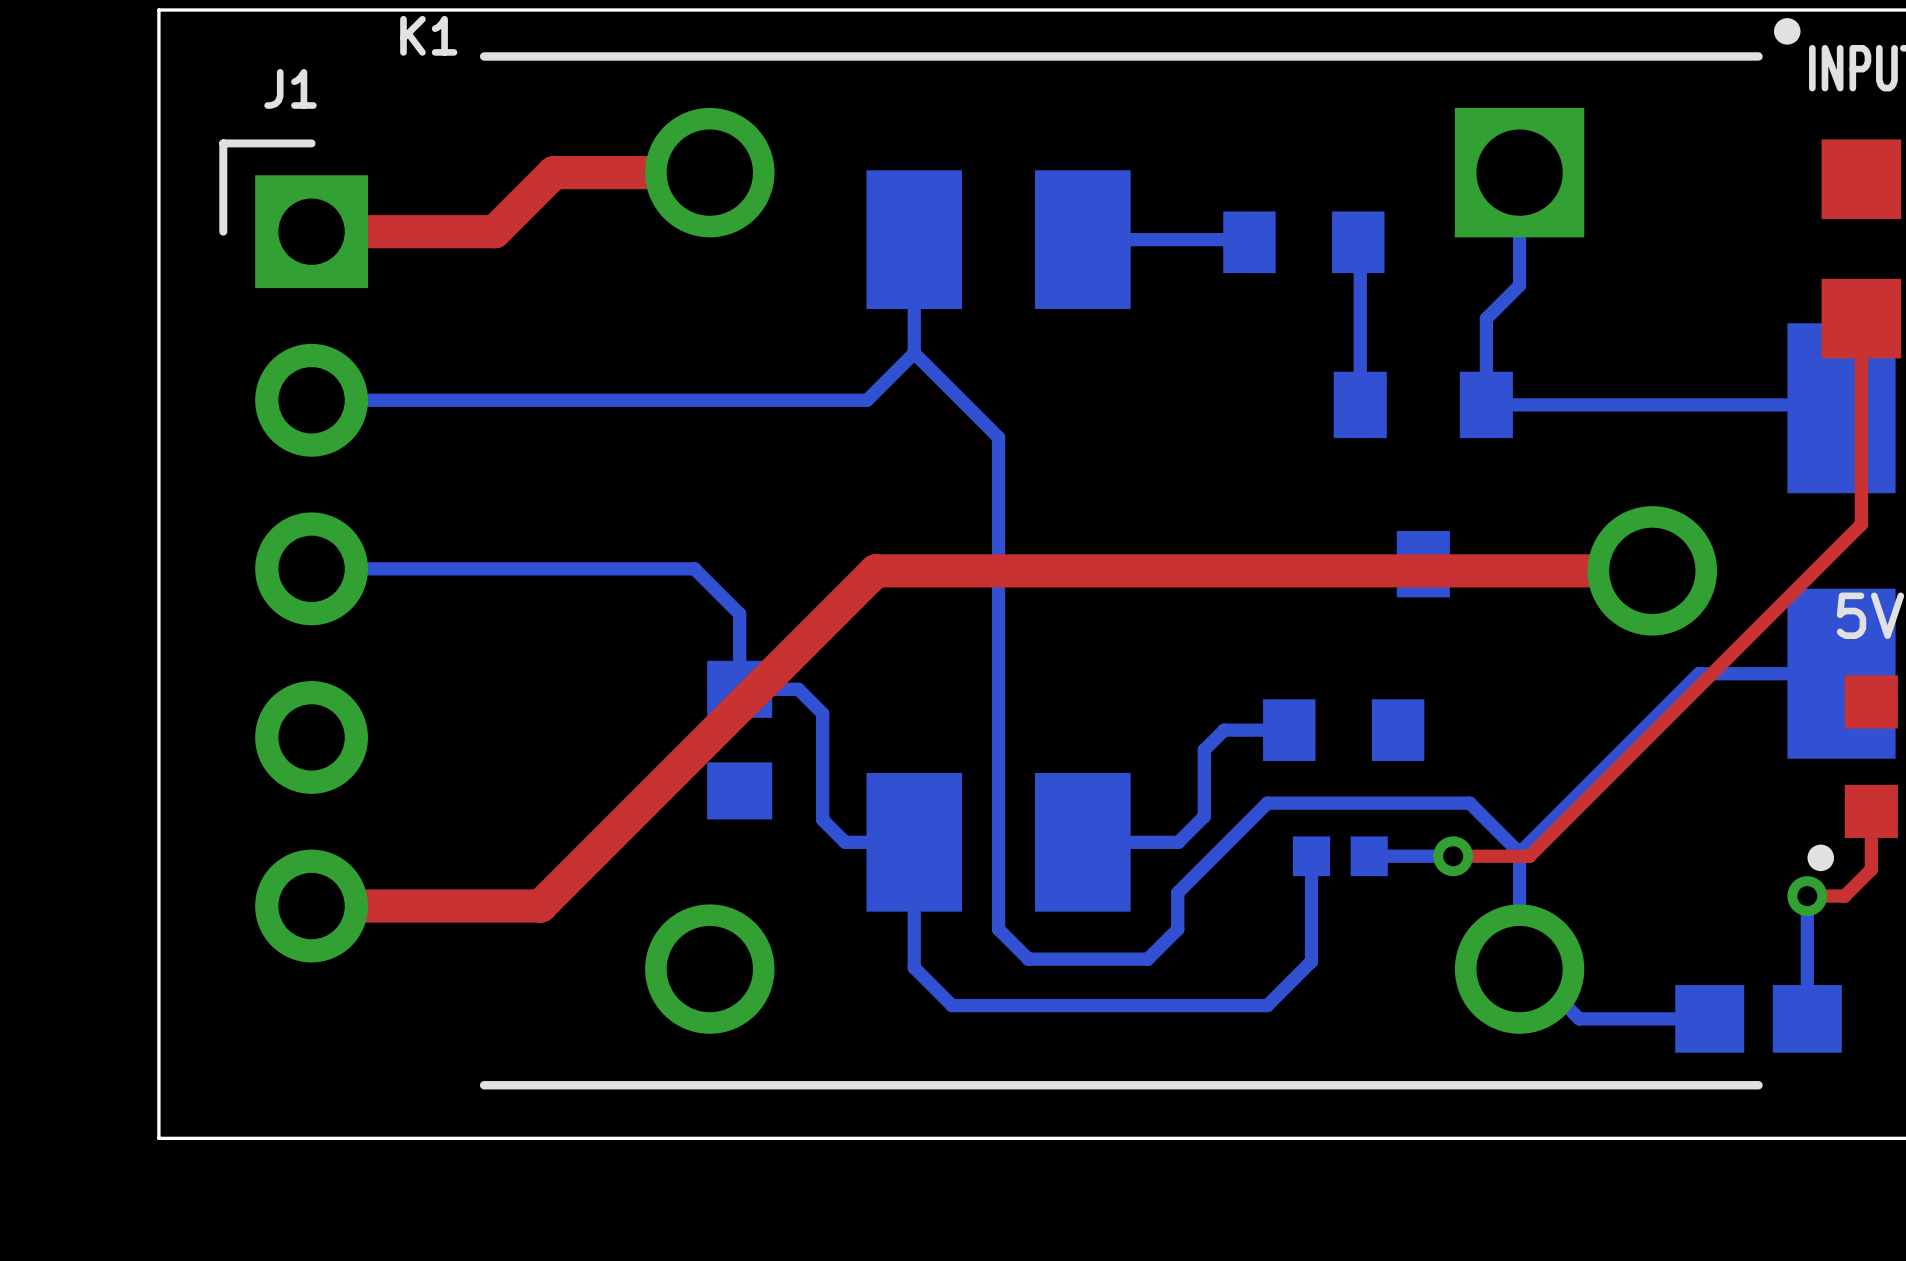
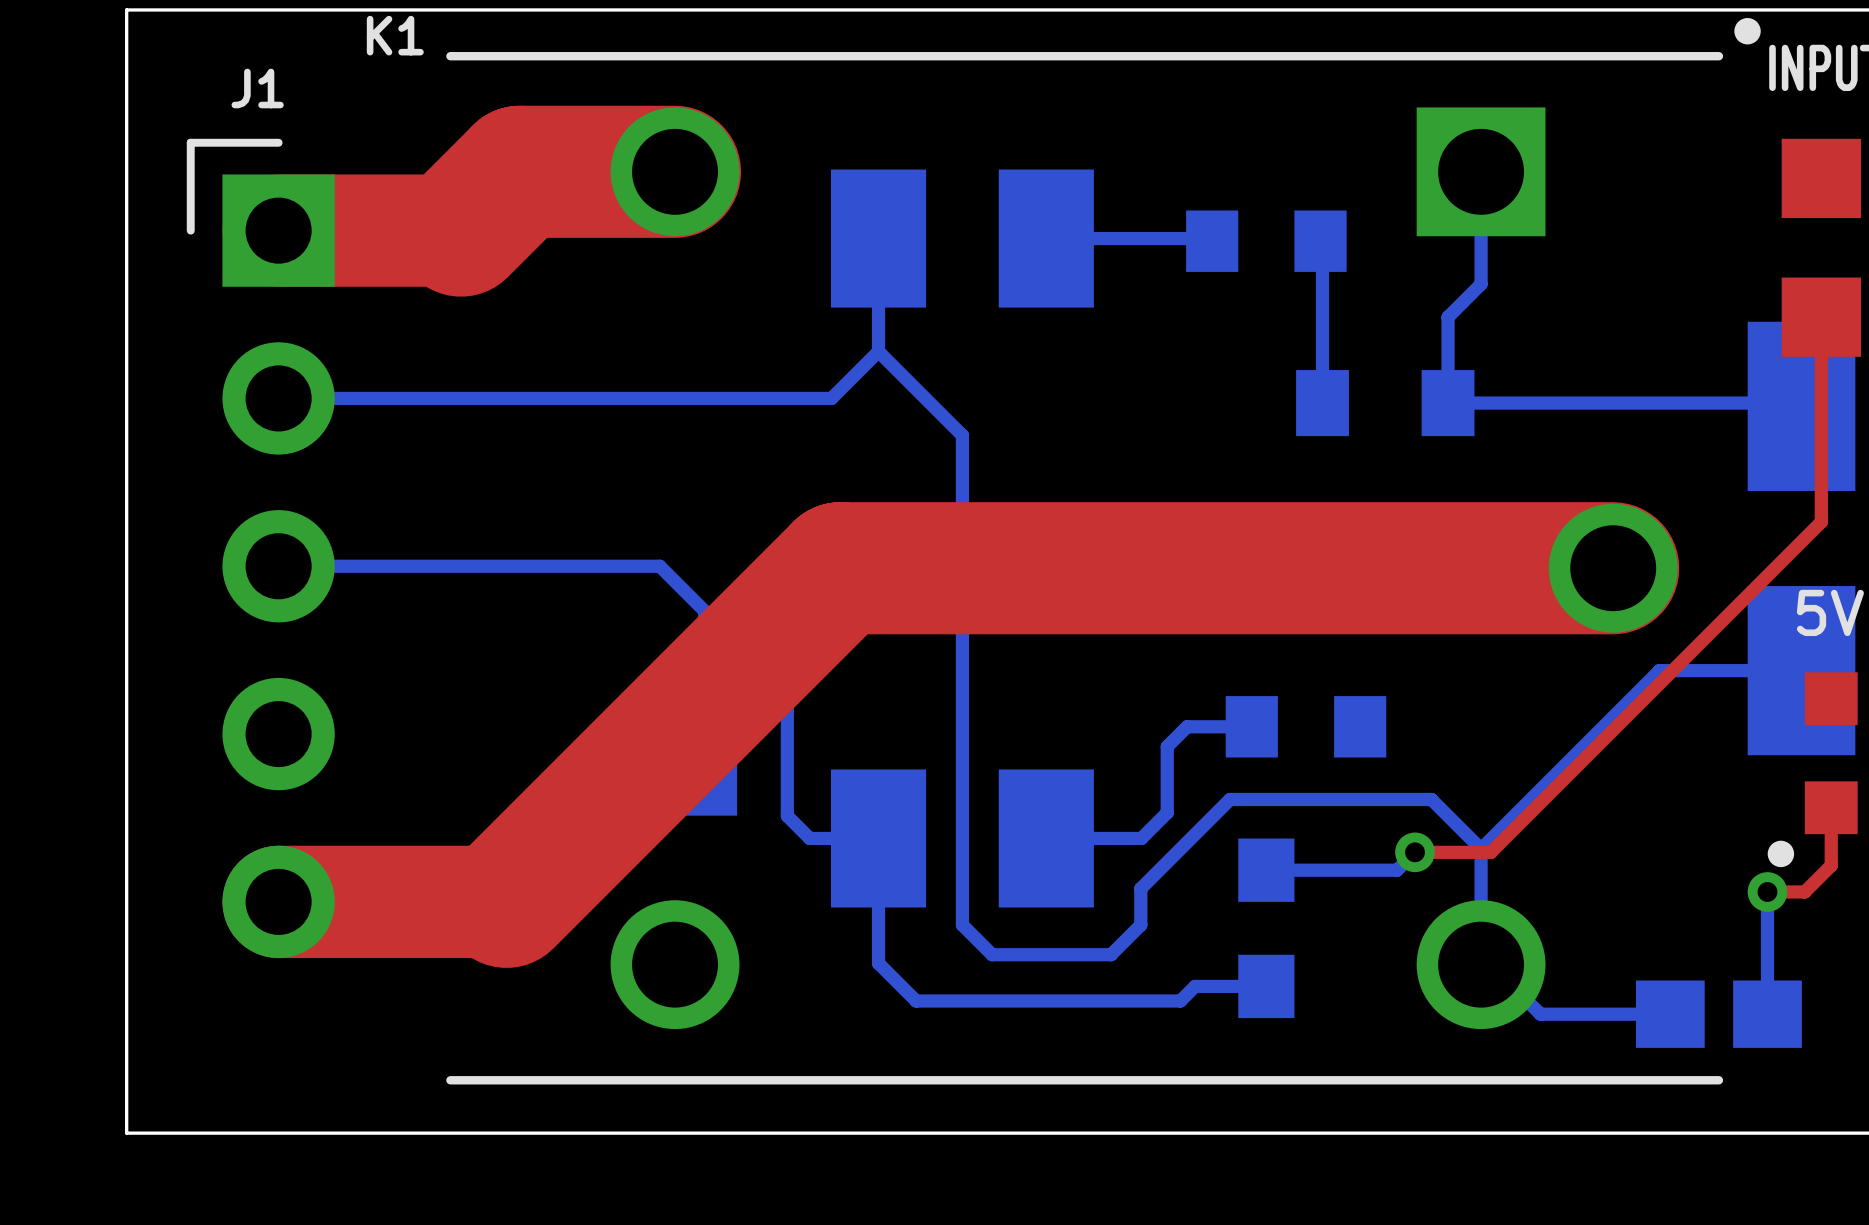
top track width: thin (709, 172) (553, 172) (494, 231) (311, 231) -> thick (675, 171) (519, 171) (460, 230) (278, 230)
top track width: thin (1652, 570) (875, 570) (540, 906) (311, 906) -> thick (1613, 568) (840, 568) (506, 901) (278, 901)
bottom track: (1311, 856) (1311, 961) (1267, 1005) (1217, 1005) -> (1266, 986) (1195, 986) (1180, 1000)
part: (1340, 856) -> none
bottom track: (1369, 856) (1453, 856) -> (1266, 870) (1397, 870) (1415, 852)
part: none -> (1266, 928)

